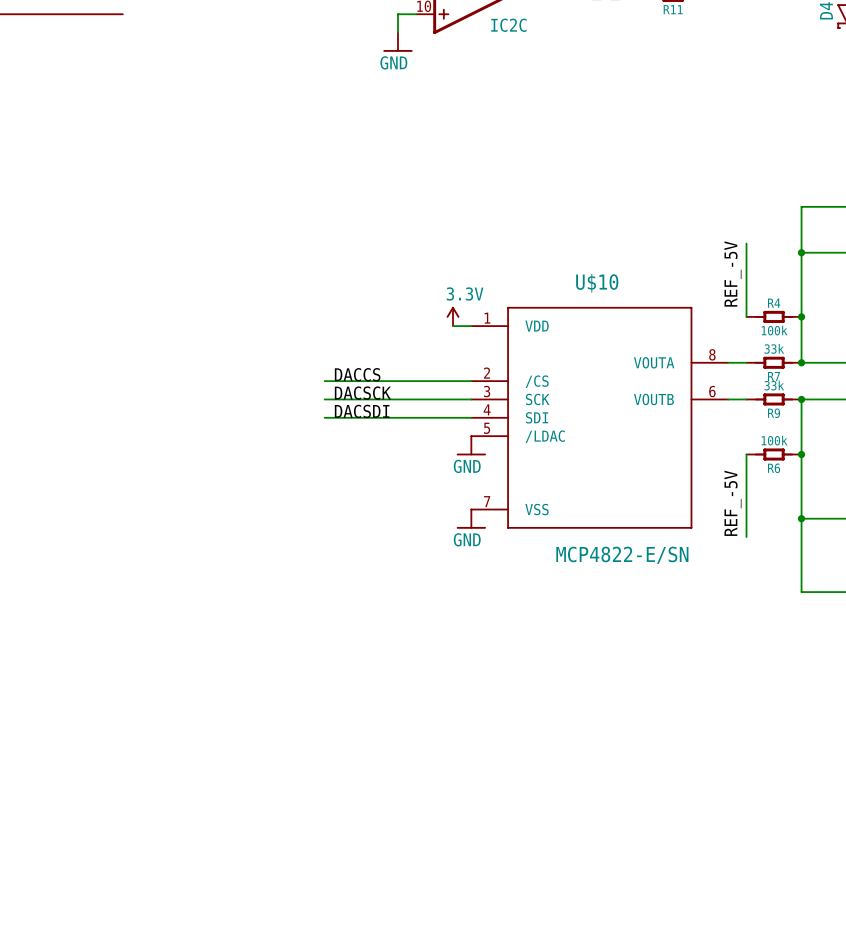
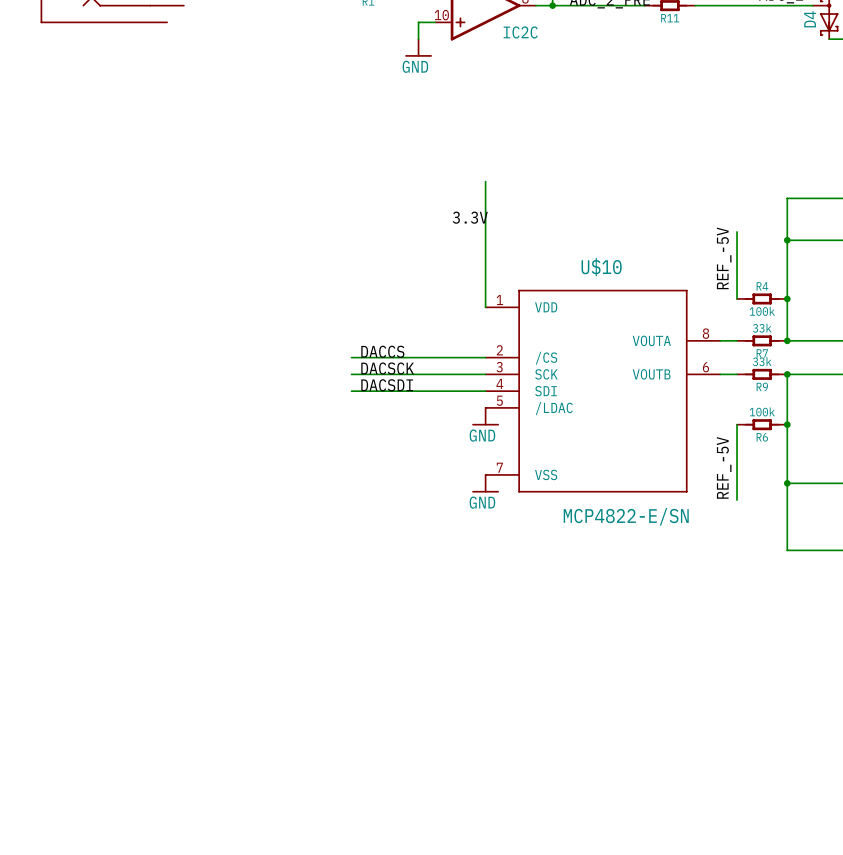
label: none -> 3.3V (470, 217)
power symbol: 3.3V (453, 316) -> none
wire: (453, 326) (471, 326) -> (485, 181) (485, 307)

